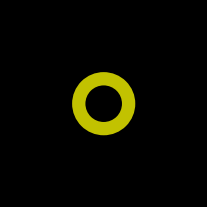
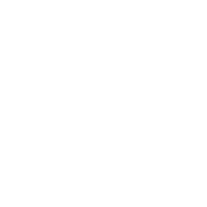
part: (103, 103) -> none

